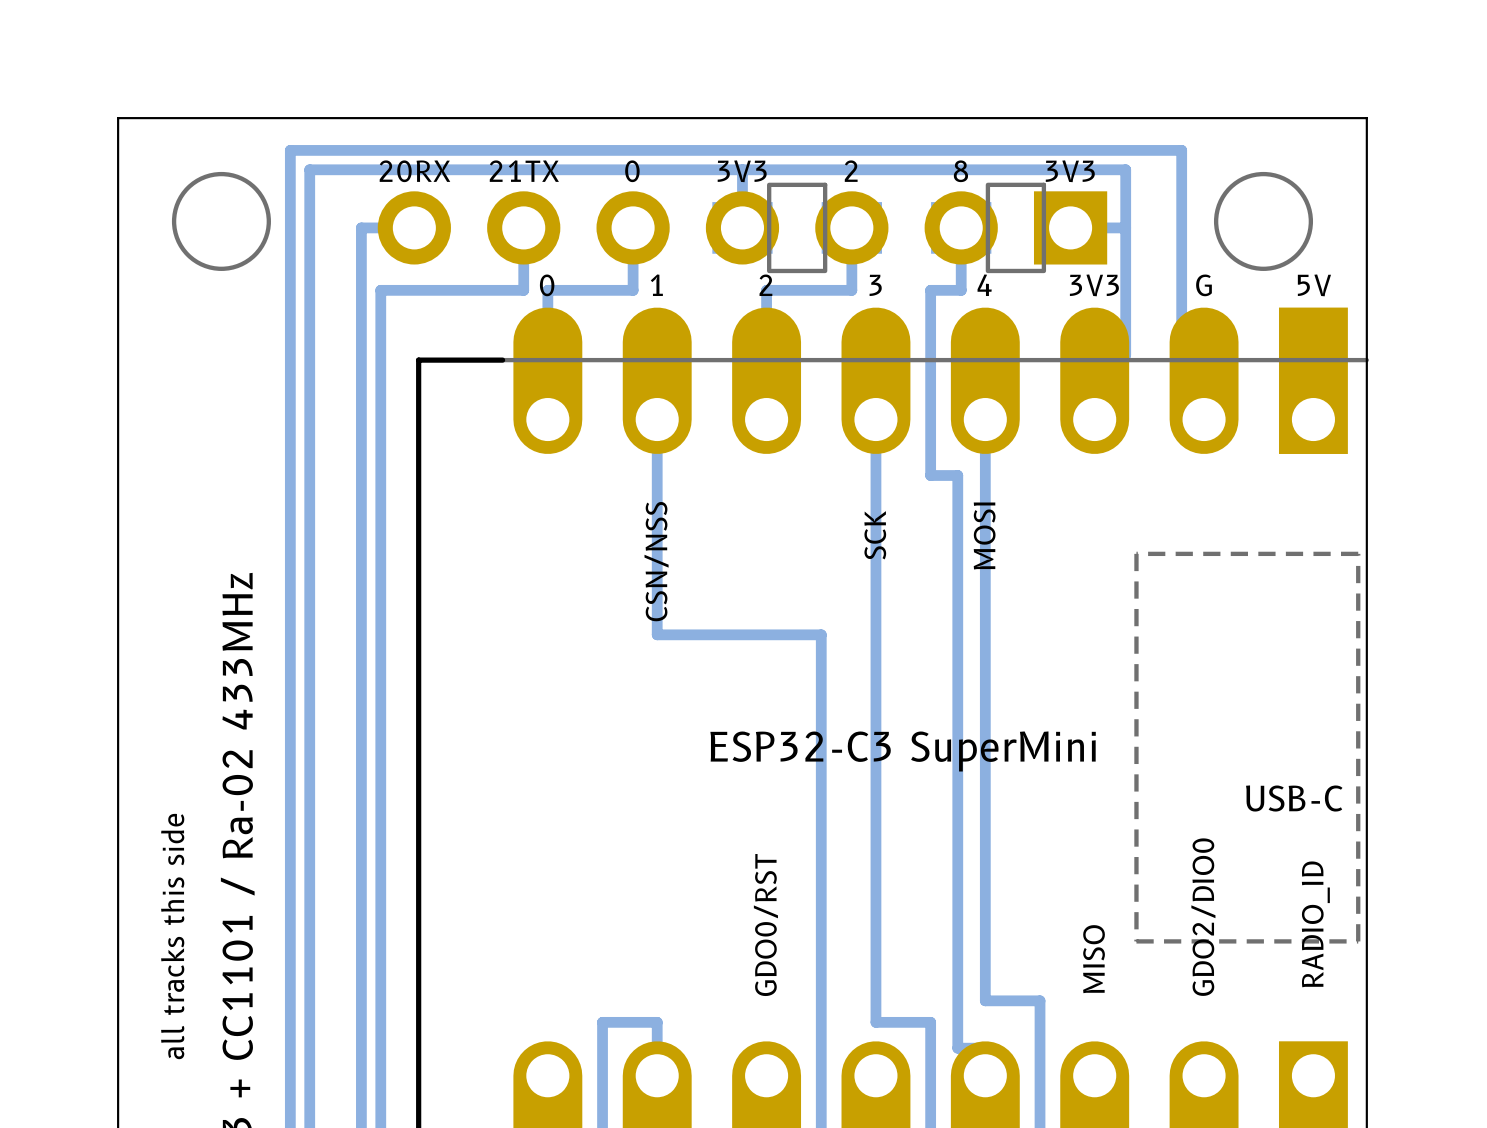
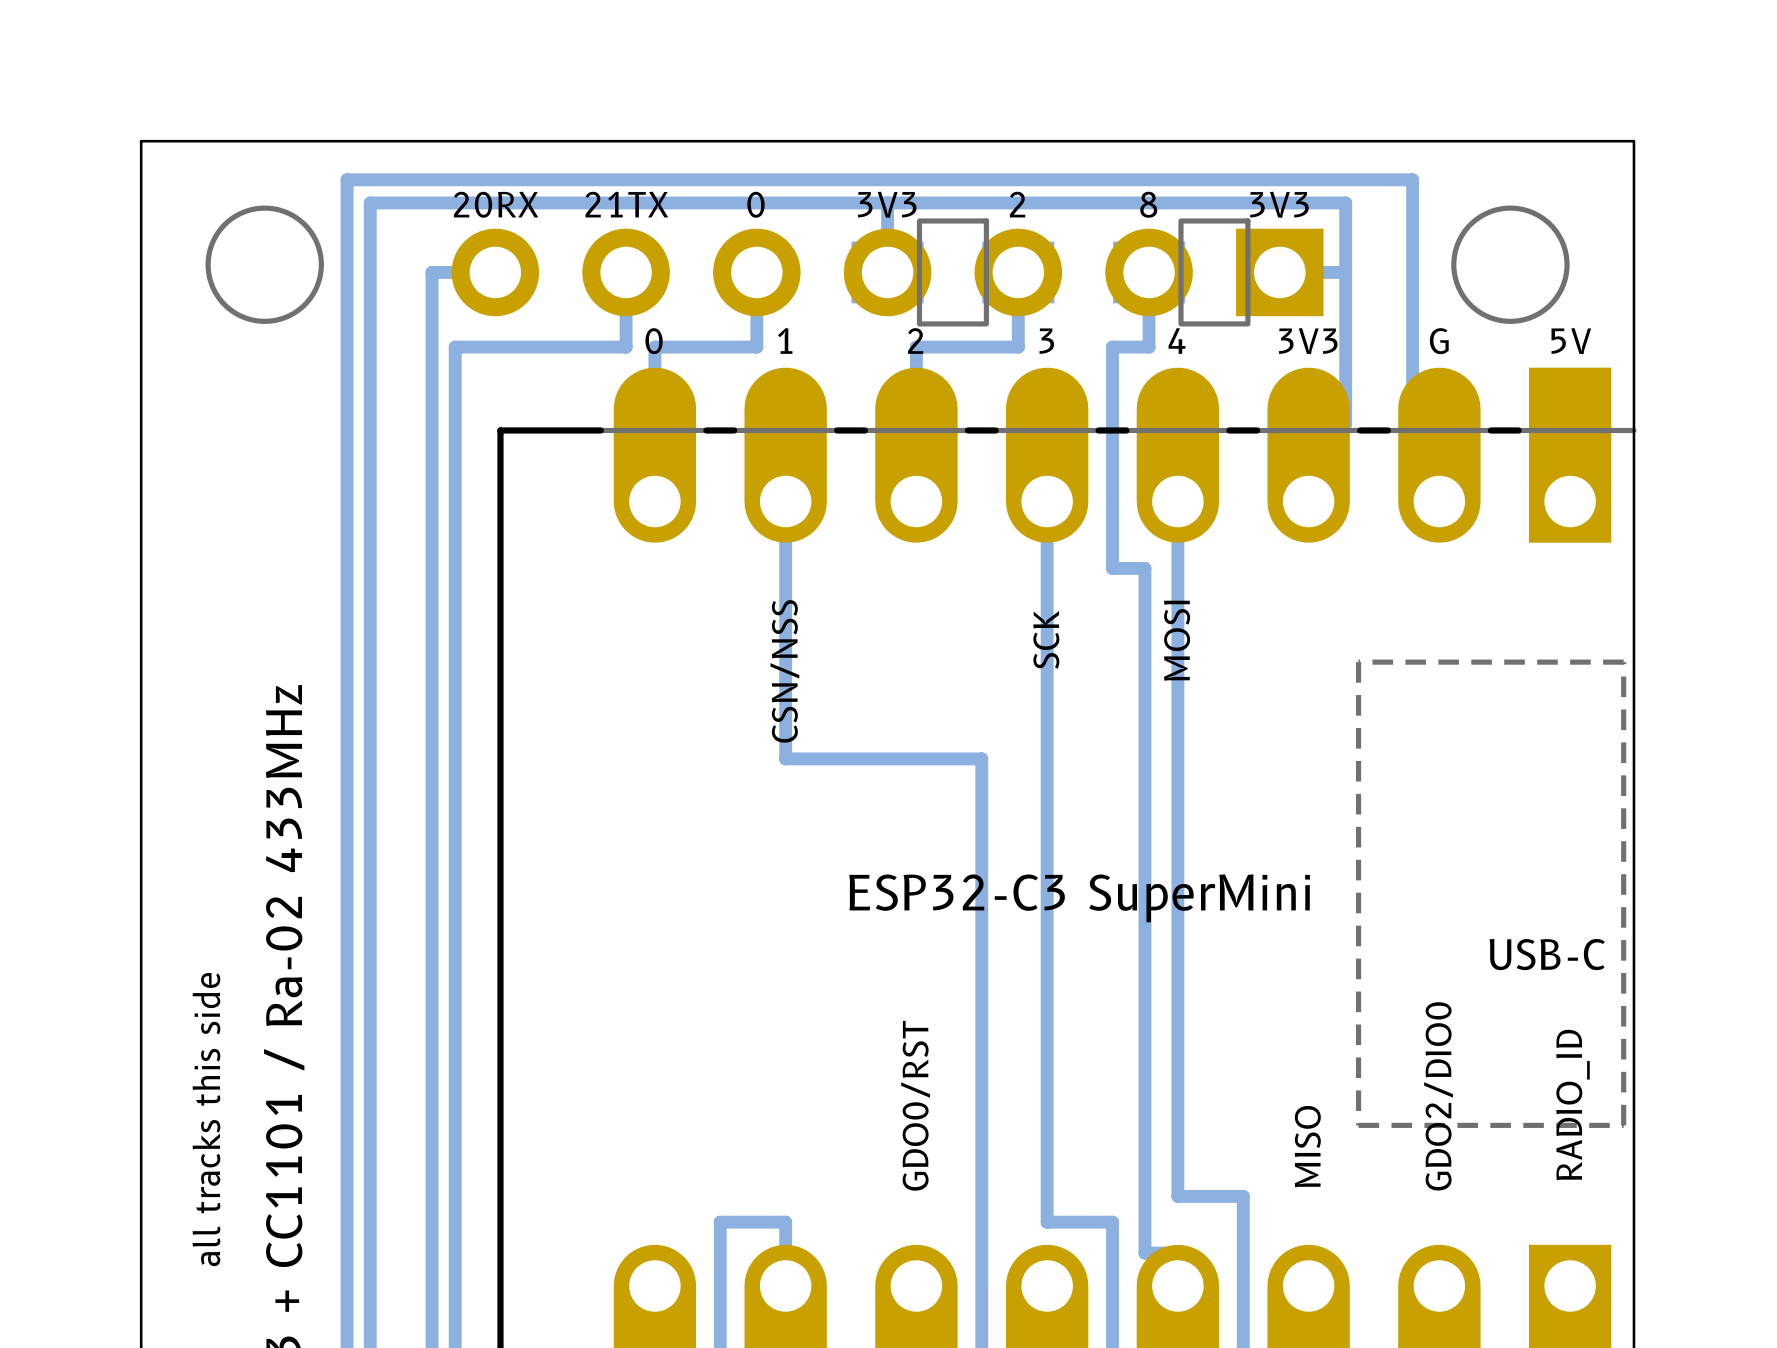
line: none -> (734, 430) (706, 430)
line: none -> (864, 430) (837, 430)
line: none -> (995, 430) (967, 430)
line: none -> (1126, 430) (1098, 430)
line: none -> (1257, 430) (1229, 430)
line: none -> (1387, 430) (1360, 430)
line: none -> (1518, 430) (1490, 430)

